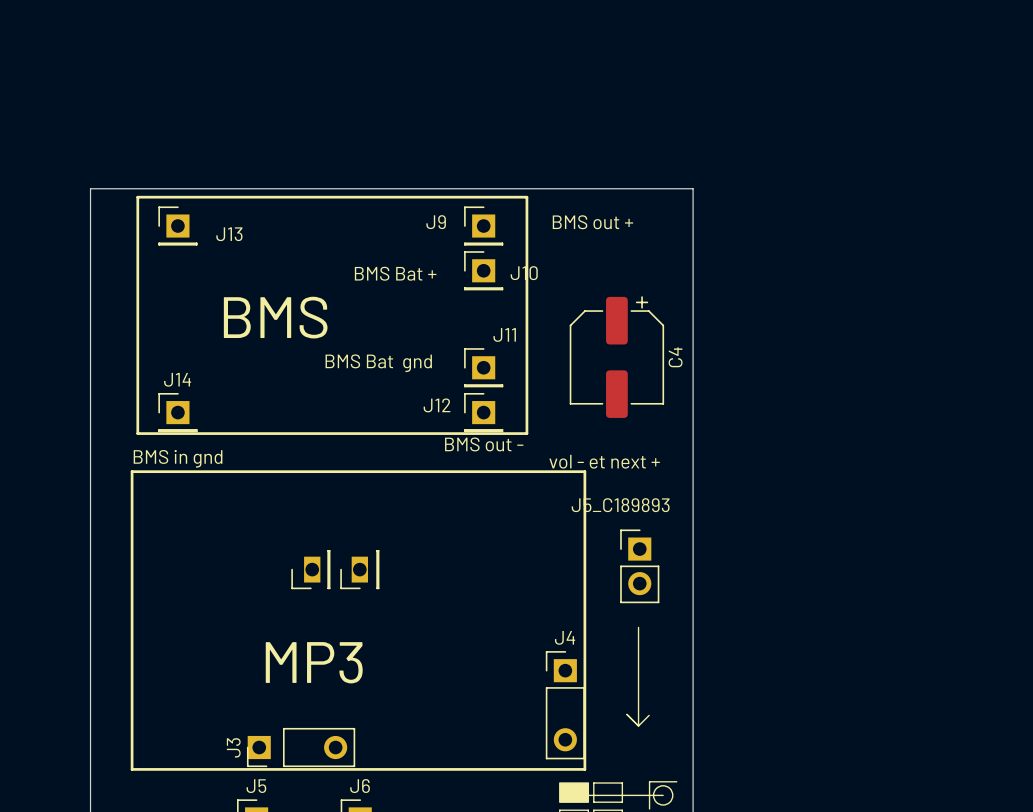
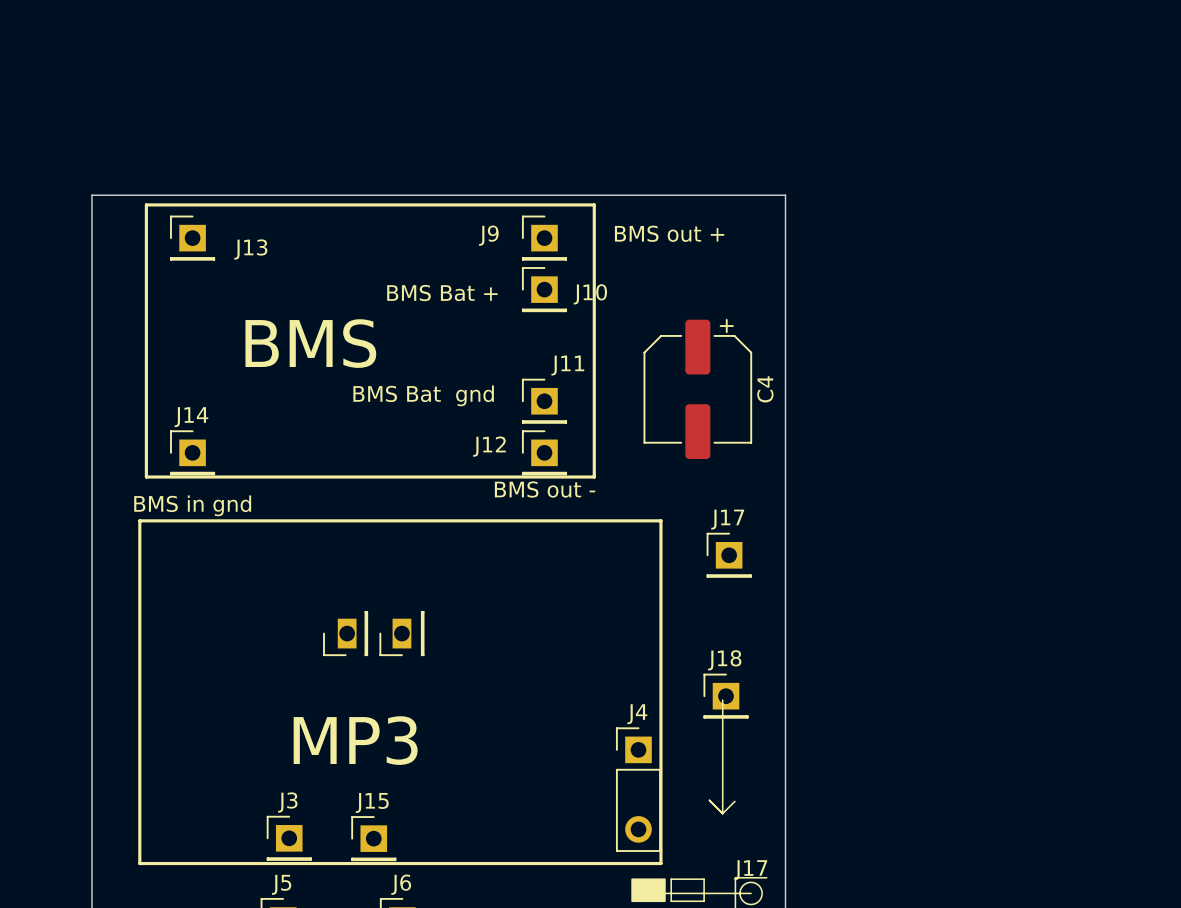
J17: none -> (729, 555)
J5_C189893: vol - et next + (639, 566) -> none
J18: none -> (726, 696)
J3 footprint: [246, 727, 356, 768] -> [266, 815, 312, 861]
J3 name position: J3 (233, 747) -> J3 (287, 802)
J15: none -> (373, 838)
text: none -> J17 (750, 870)

